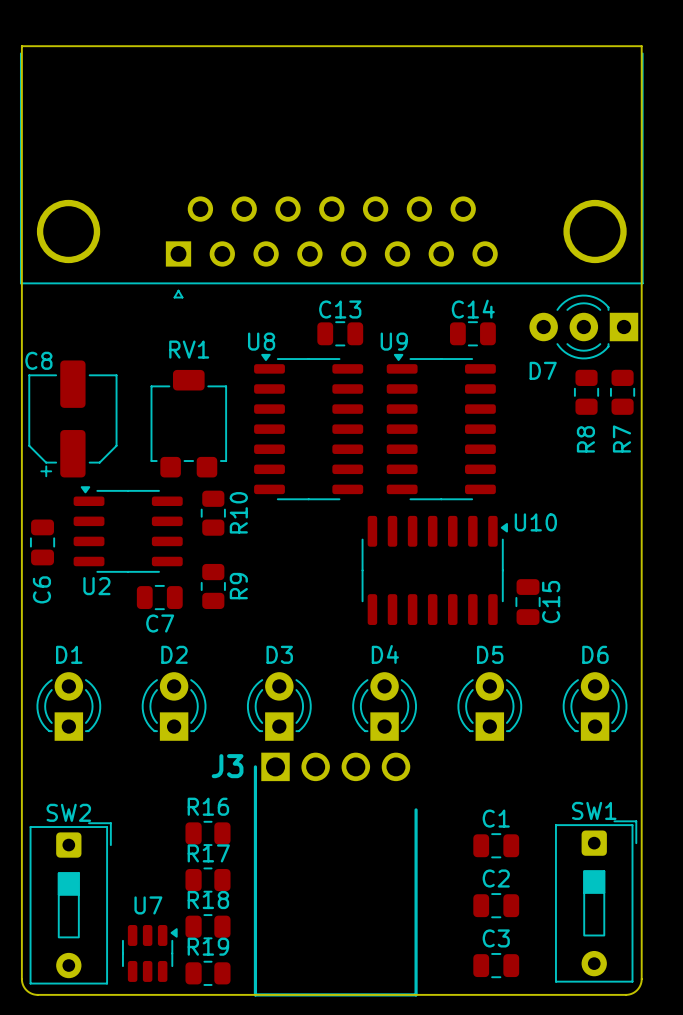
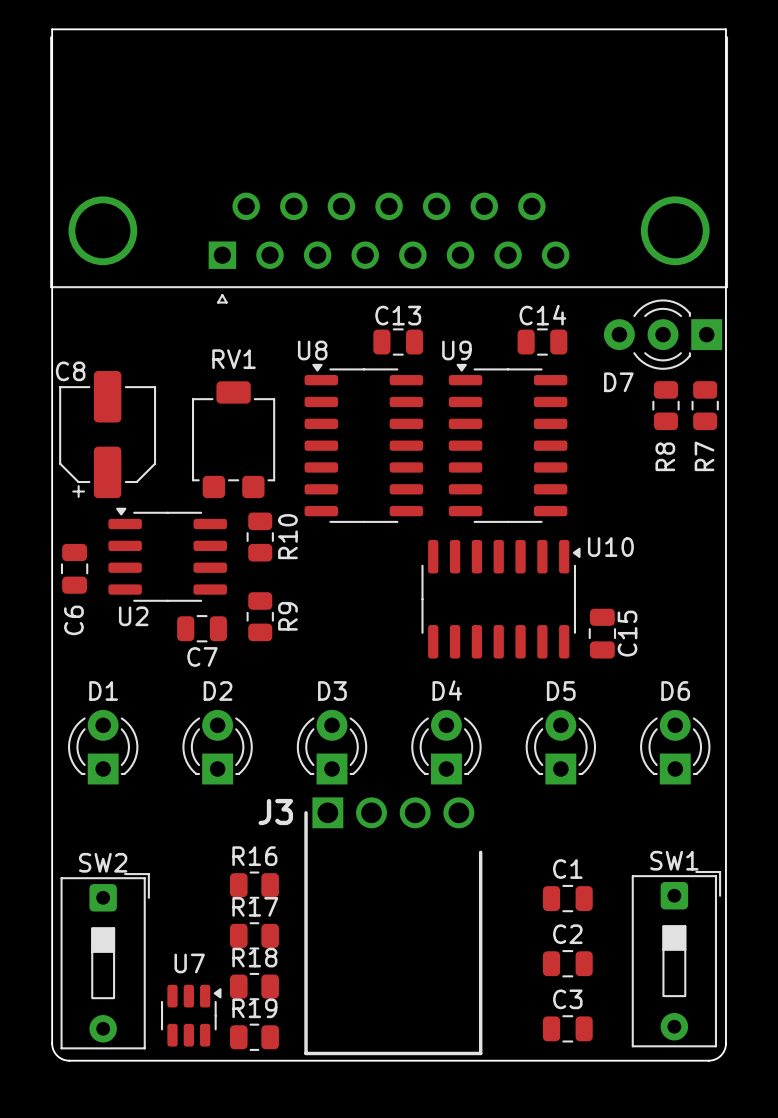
J3 footprint: [253, 752, 418, 997] -> [304, 797, 483, 1056]

